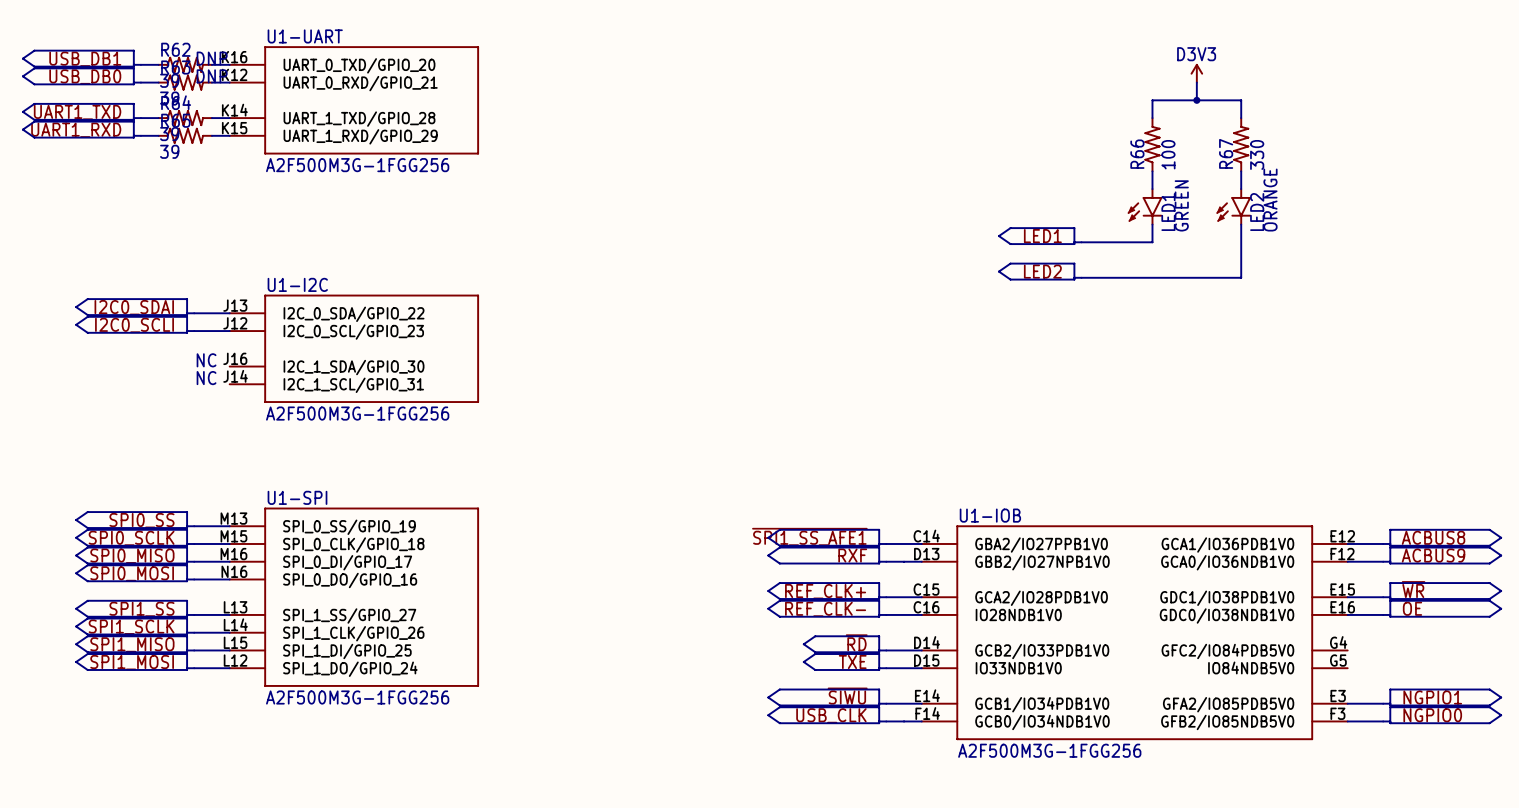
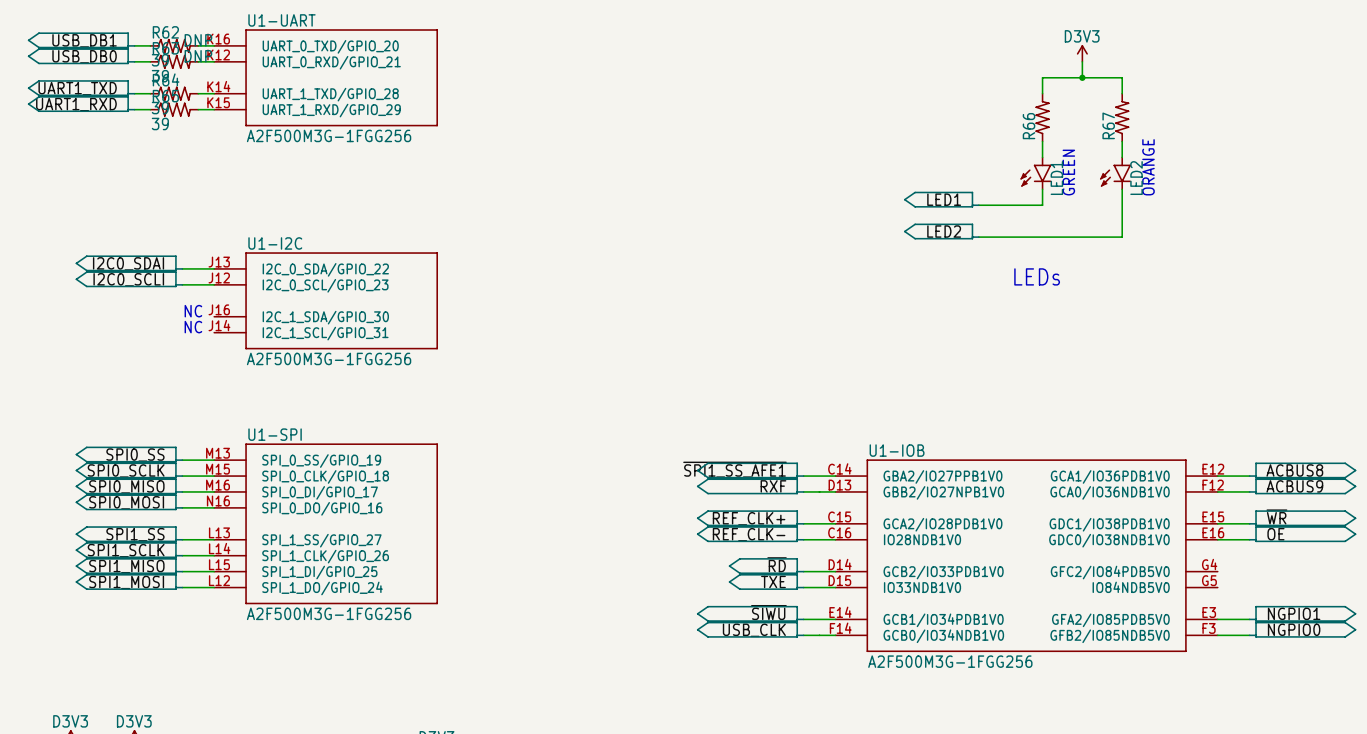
R66 value: 100 (1168, 154) -> none
R67 value: 330 (1257, 154) -> none
text: none -> LEDs (1037, 276)

